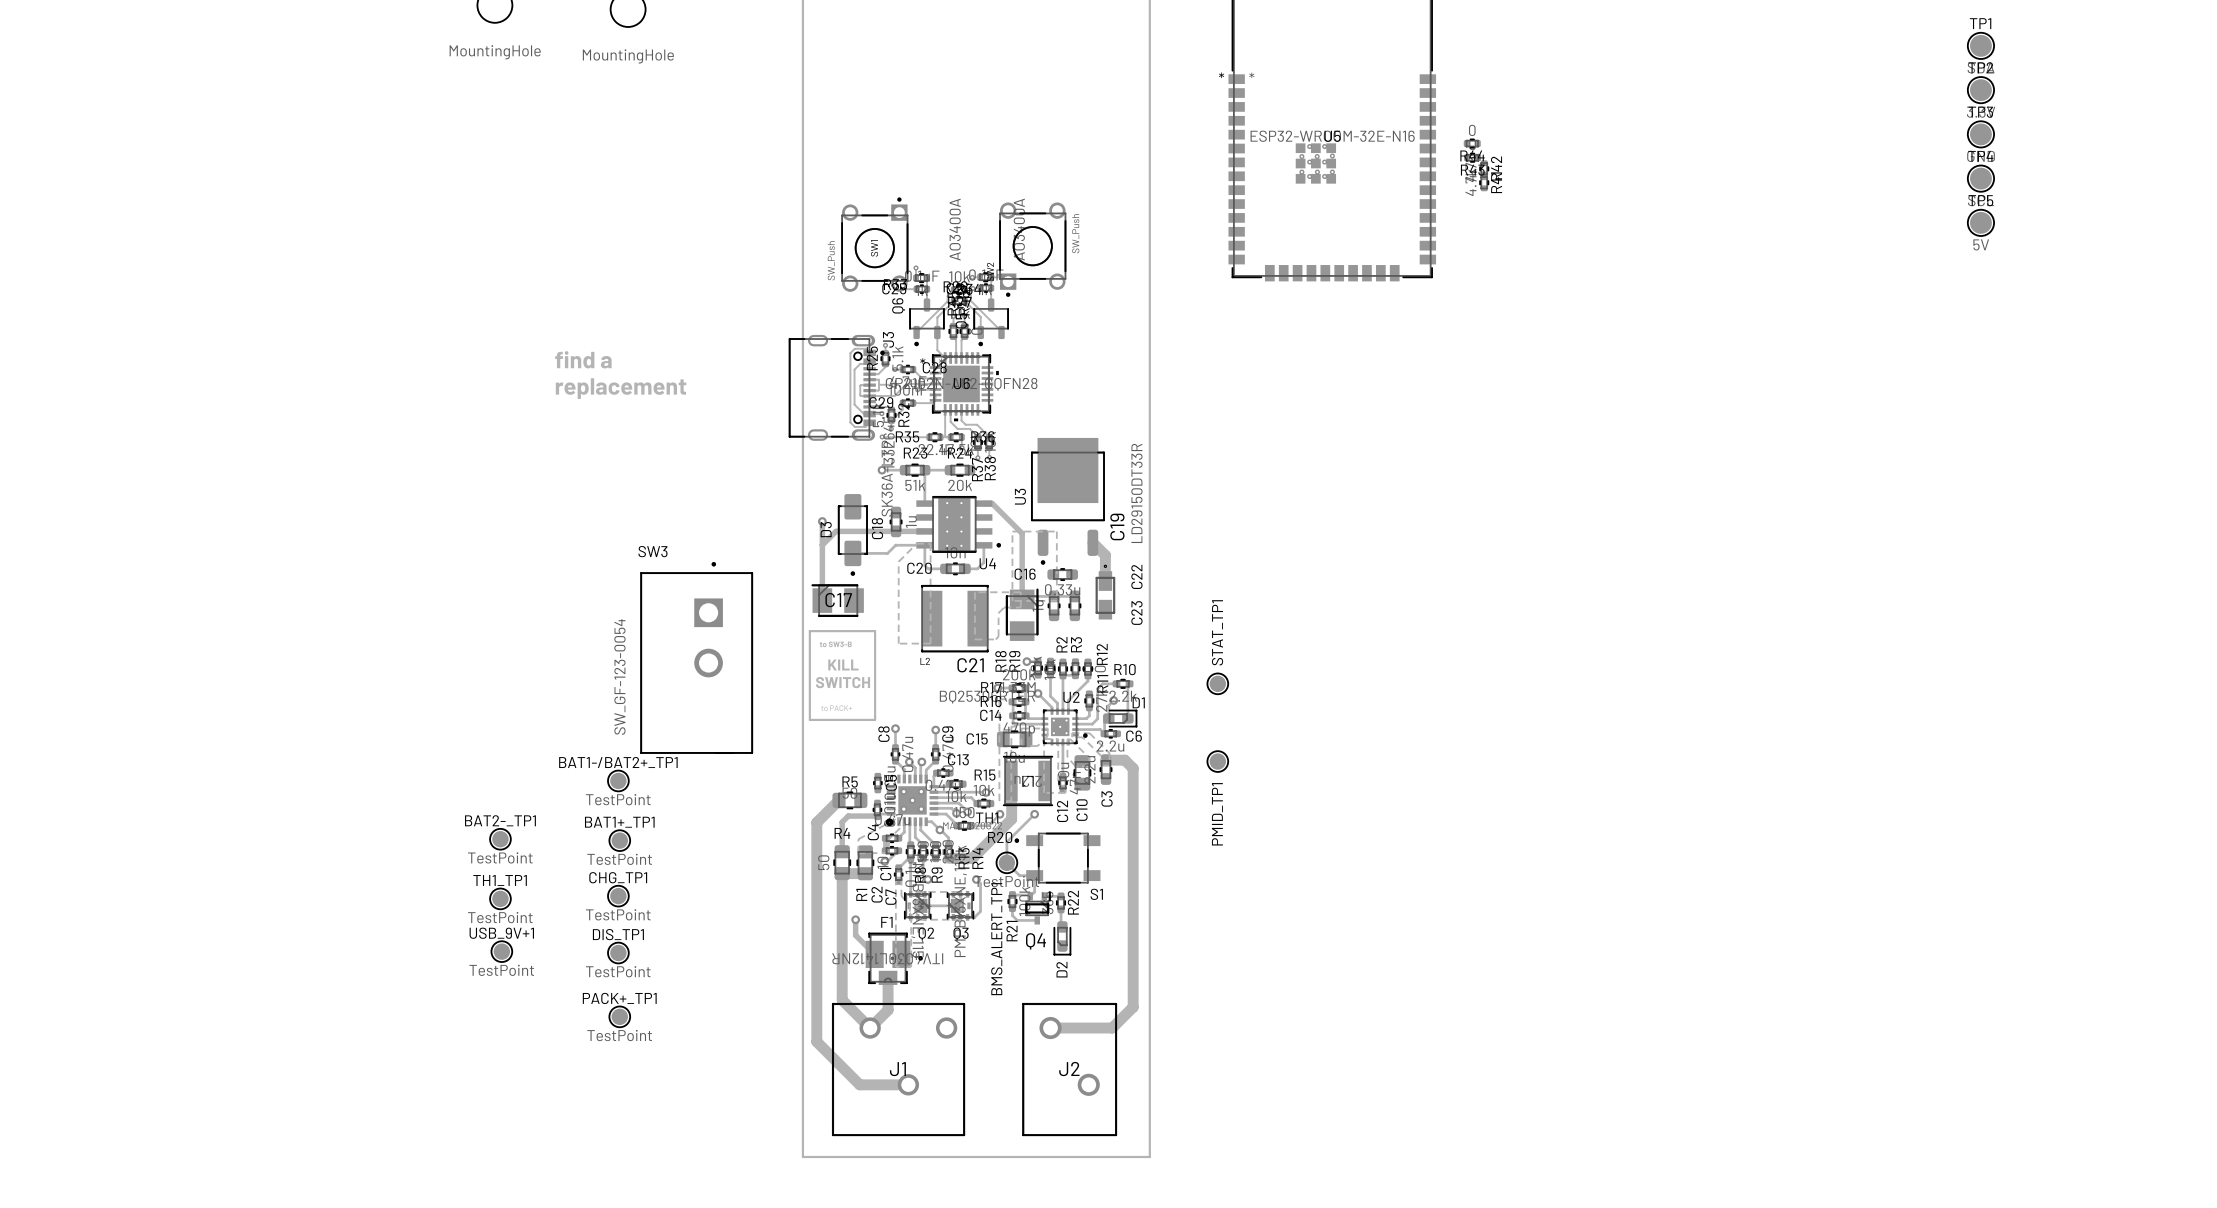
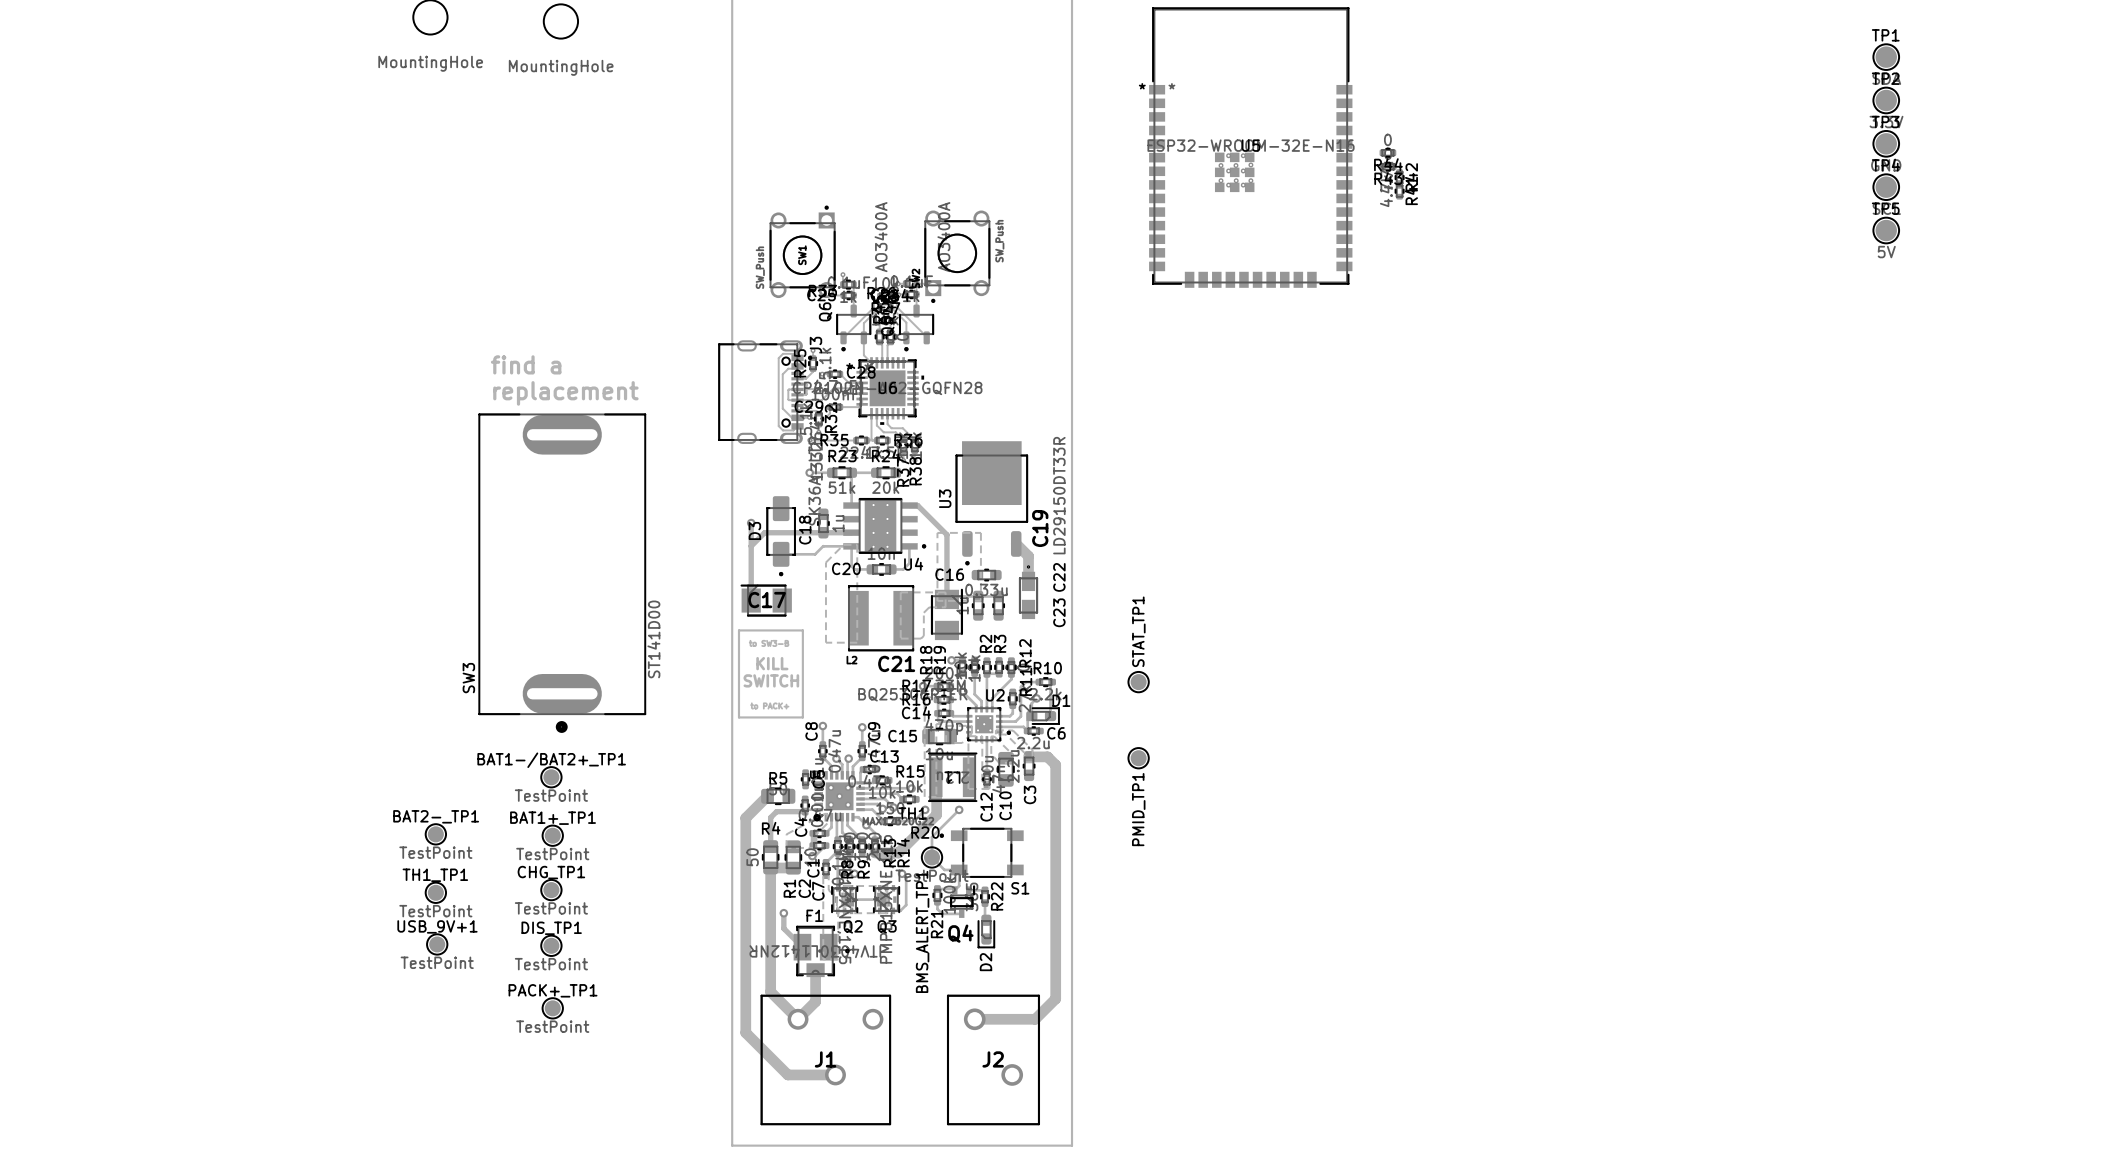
SW3 name position: SW3 (652, 551) -> SW3 (468, 678)
SW3 footprint: [640, 562, 753, 754] -> [478, 413, 646, 733]
SW3 value: SW_GF-123-0054 (619, 676) -> ST141D00 (653, 639)

